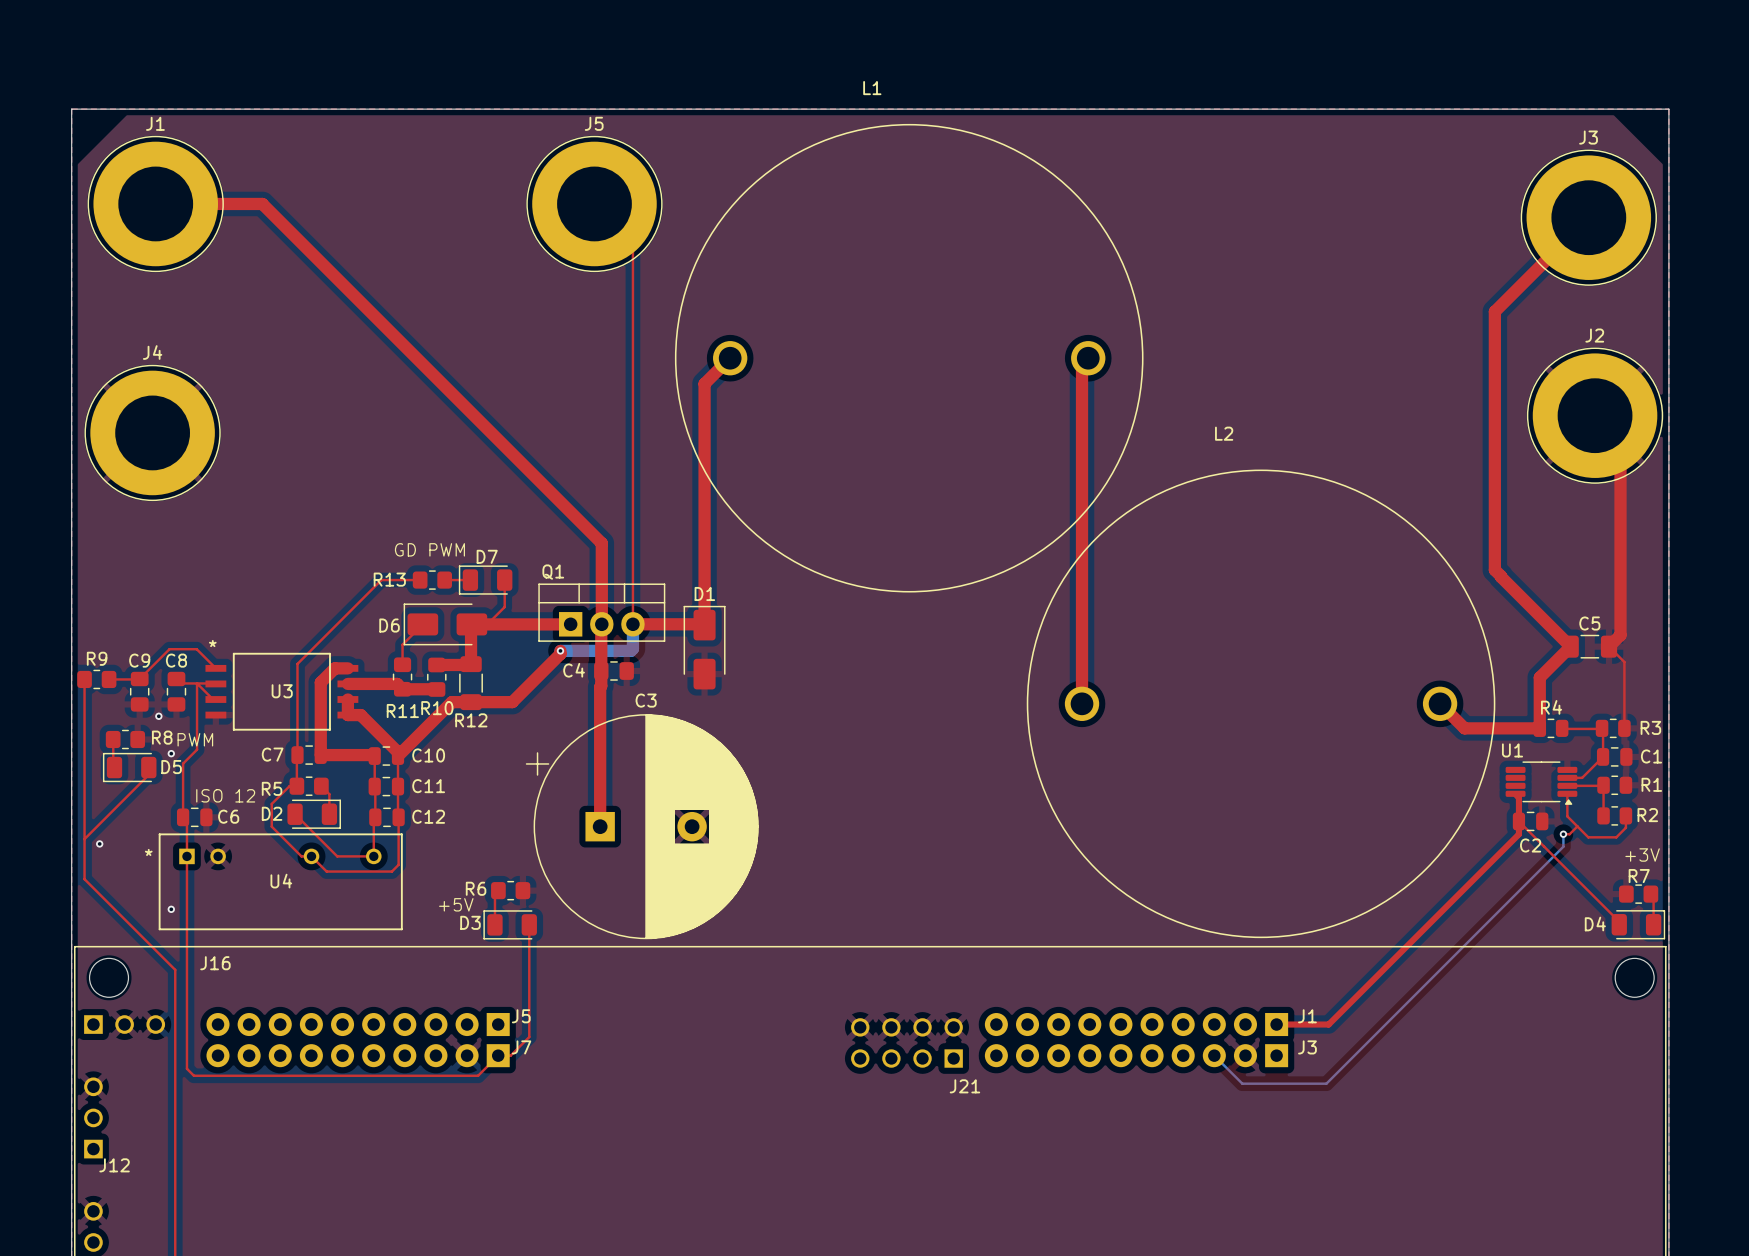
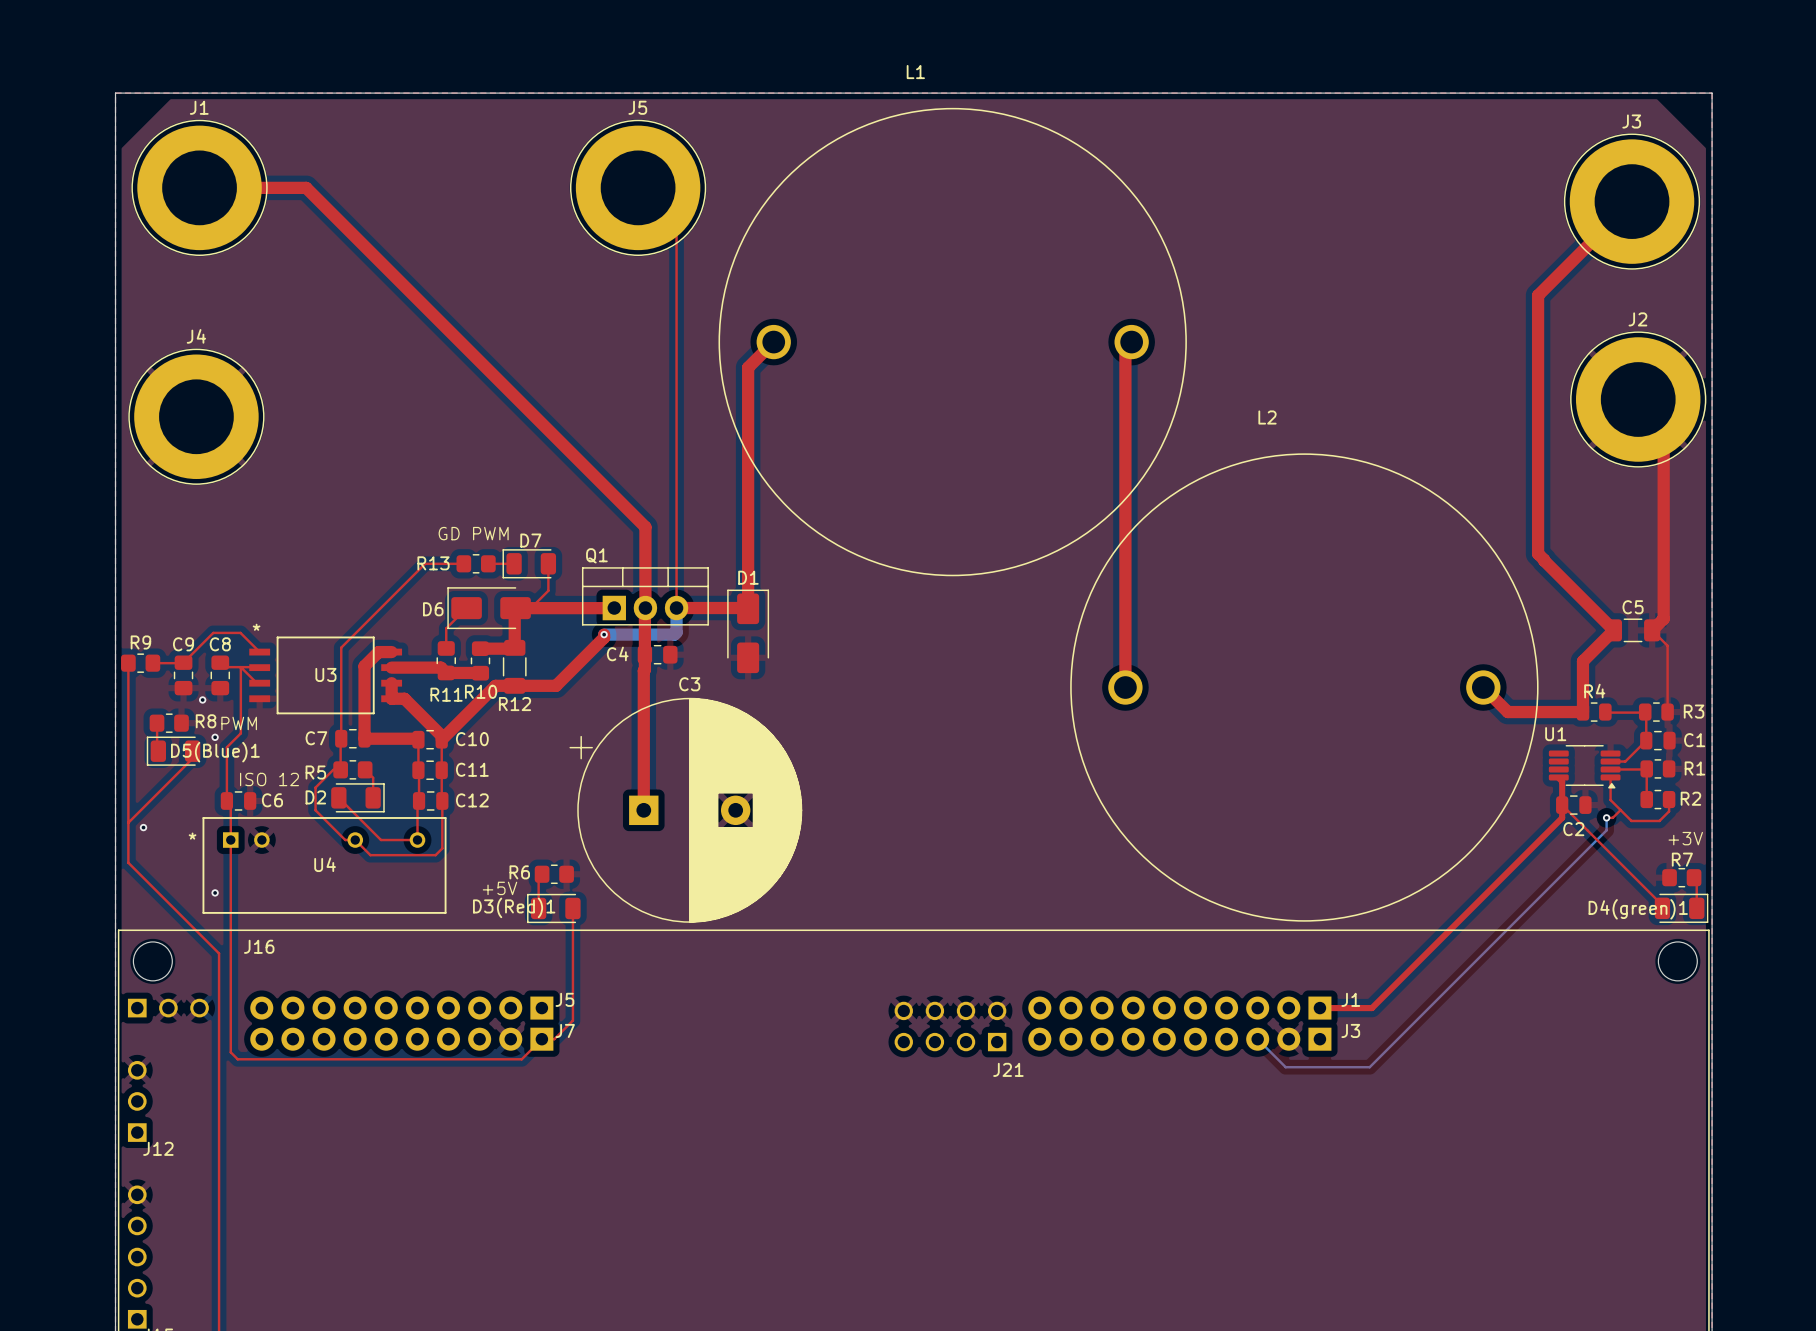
D5 name: D5 (171, 767) -> D5(Blue)1 (215, 752)
D3 name: D3 (470, 922) -> D3(Red)1 (514, 907)
D4 name: D4 (1595, 923) -> D4(green)1 (1638, 909)

